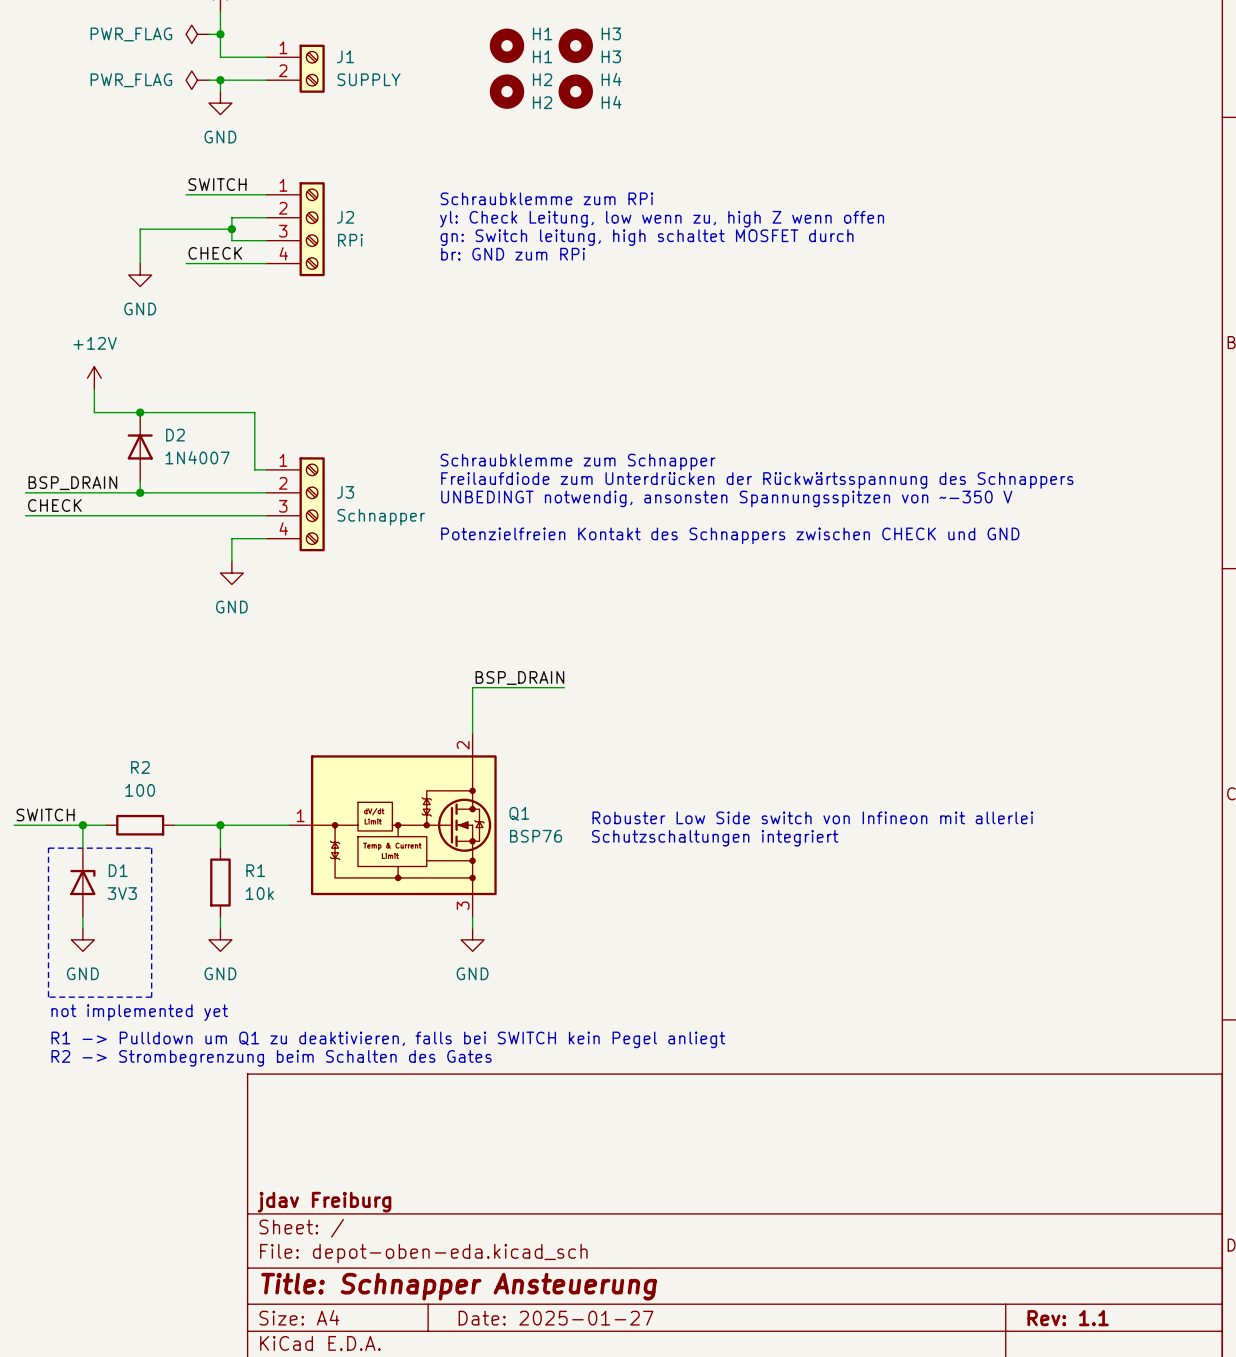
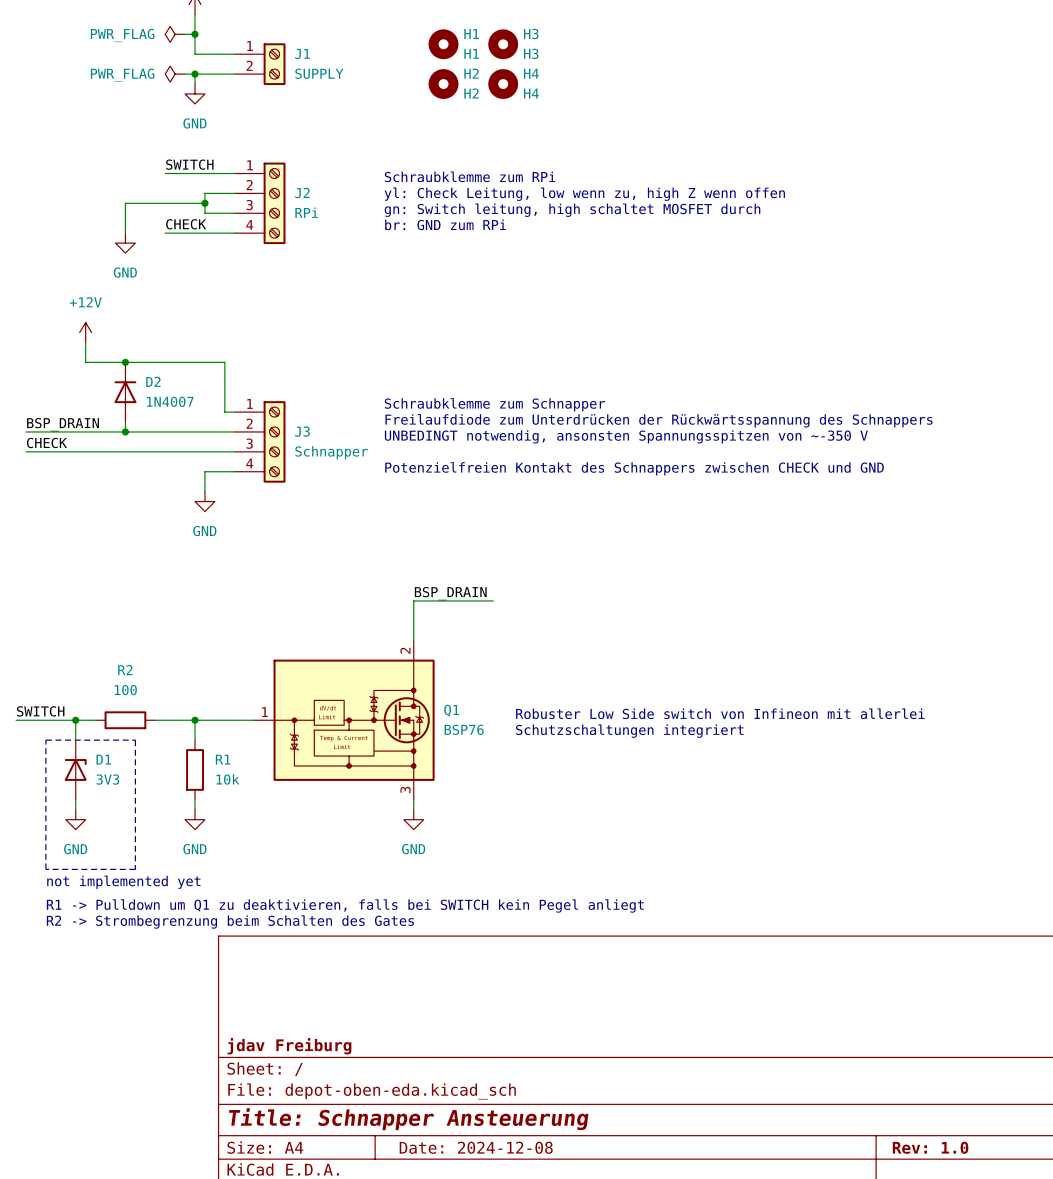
title block: Date: 2025-01-27 (556, 1318) -> Date: 2024-12-08 (476, 1147)
title block: Rev: 1.1 (1068, 1318) -> Rev: 1.0 (930, 1147)

